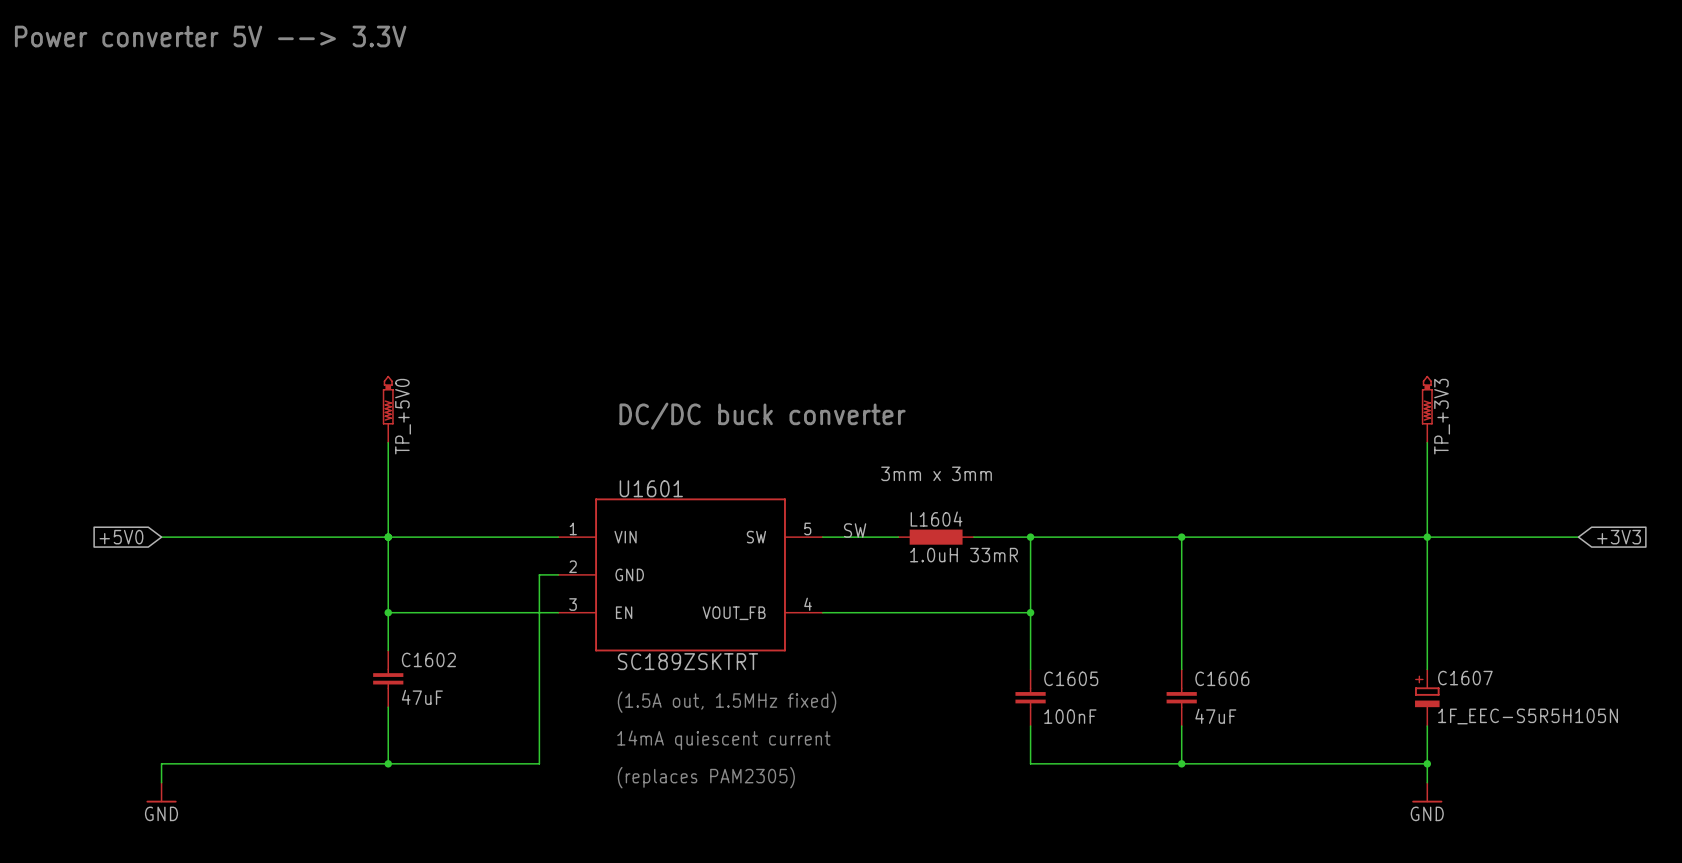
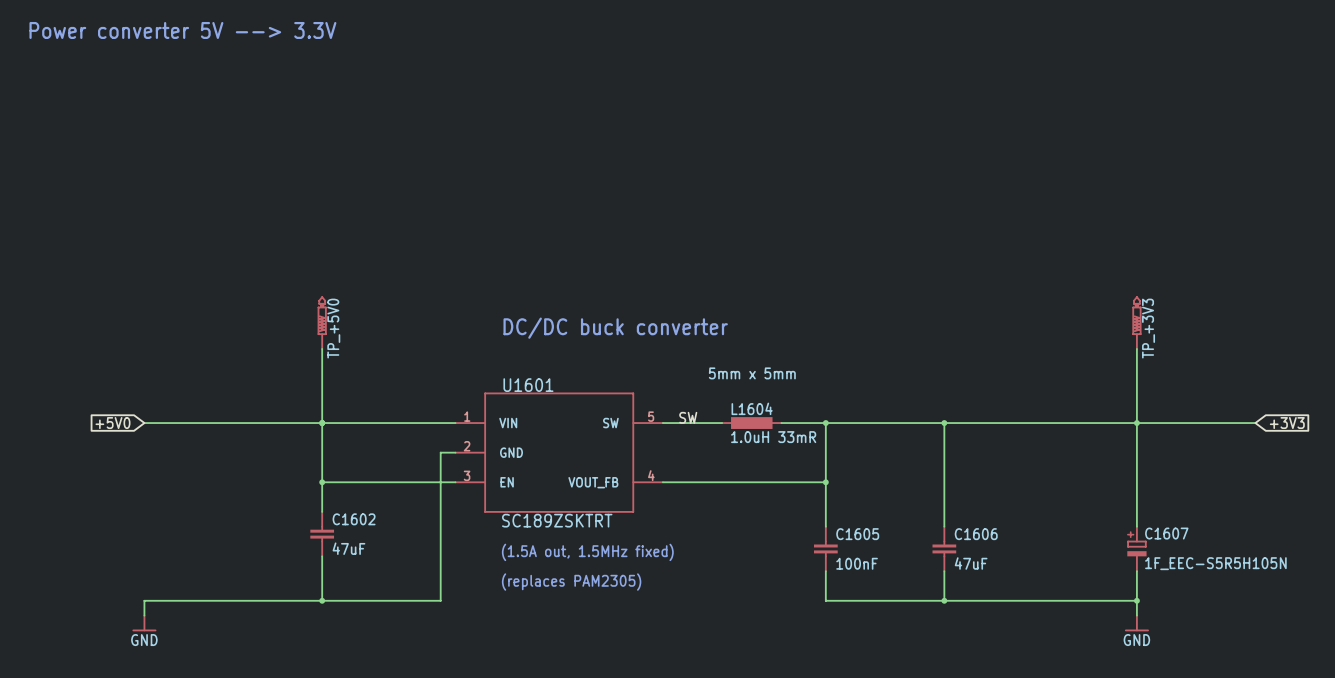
text: 3mm x 3mm (936, 473) -> 5mm x 5mm (752, 373)
text: 14mA quiescent current (723, 740) -> (replaces PAM2305) (571, 582)
text: (replaces PAM2305) (706, 777) -> none

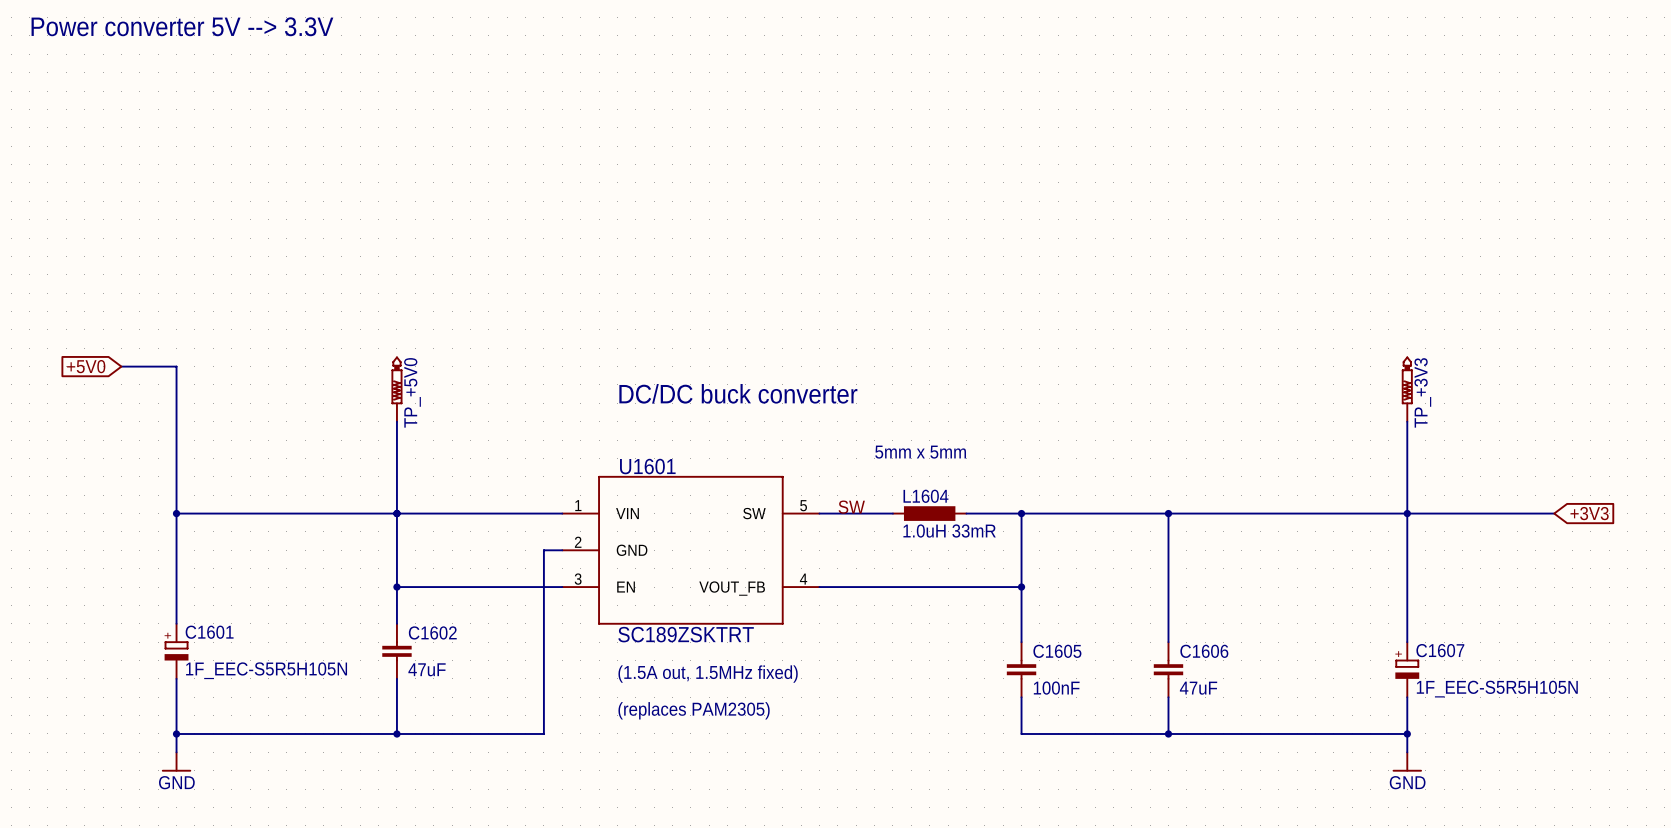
wire: none -> (121, 366) (176, 366) (176, 623)
global label position: +5V0 (113, 423) -> +5V0 (86, 366)
junction: none -> (176, 513)
C1601: none -> 1F_EEC-S5R5H105N (176, 651)
wire: none -> (176, 678) (176, 733)
junction: none -> (176, 733)

